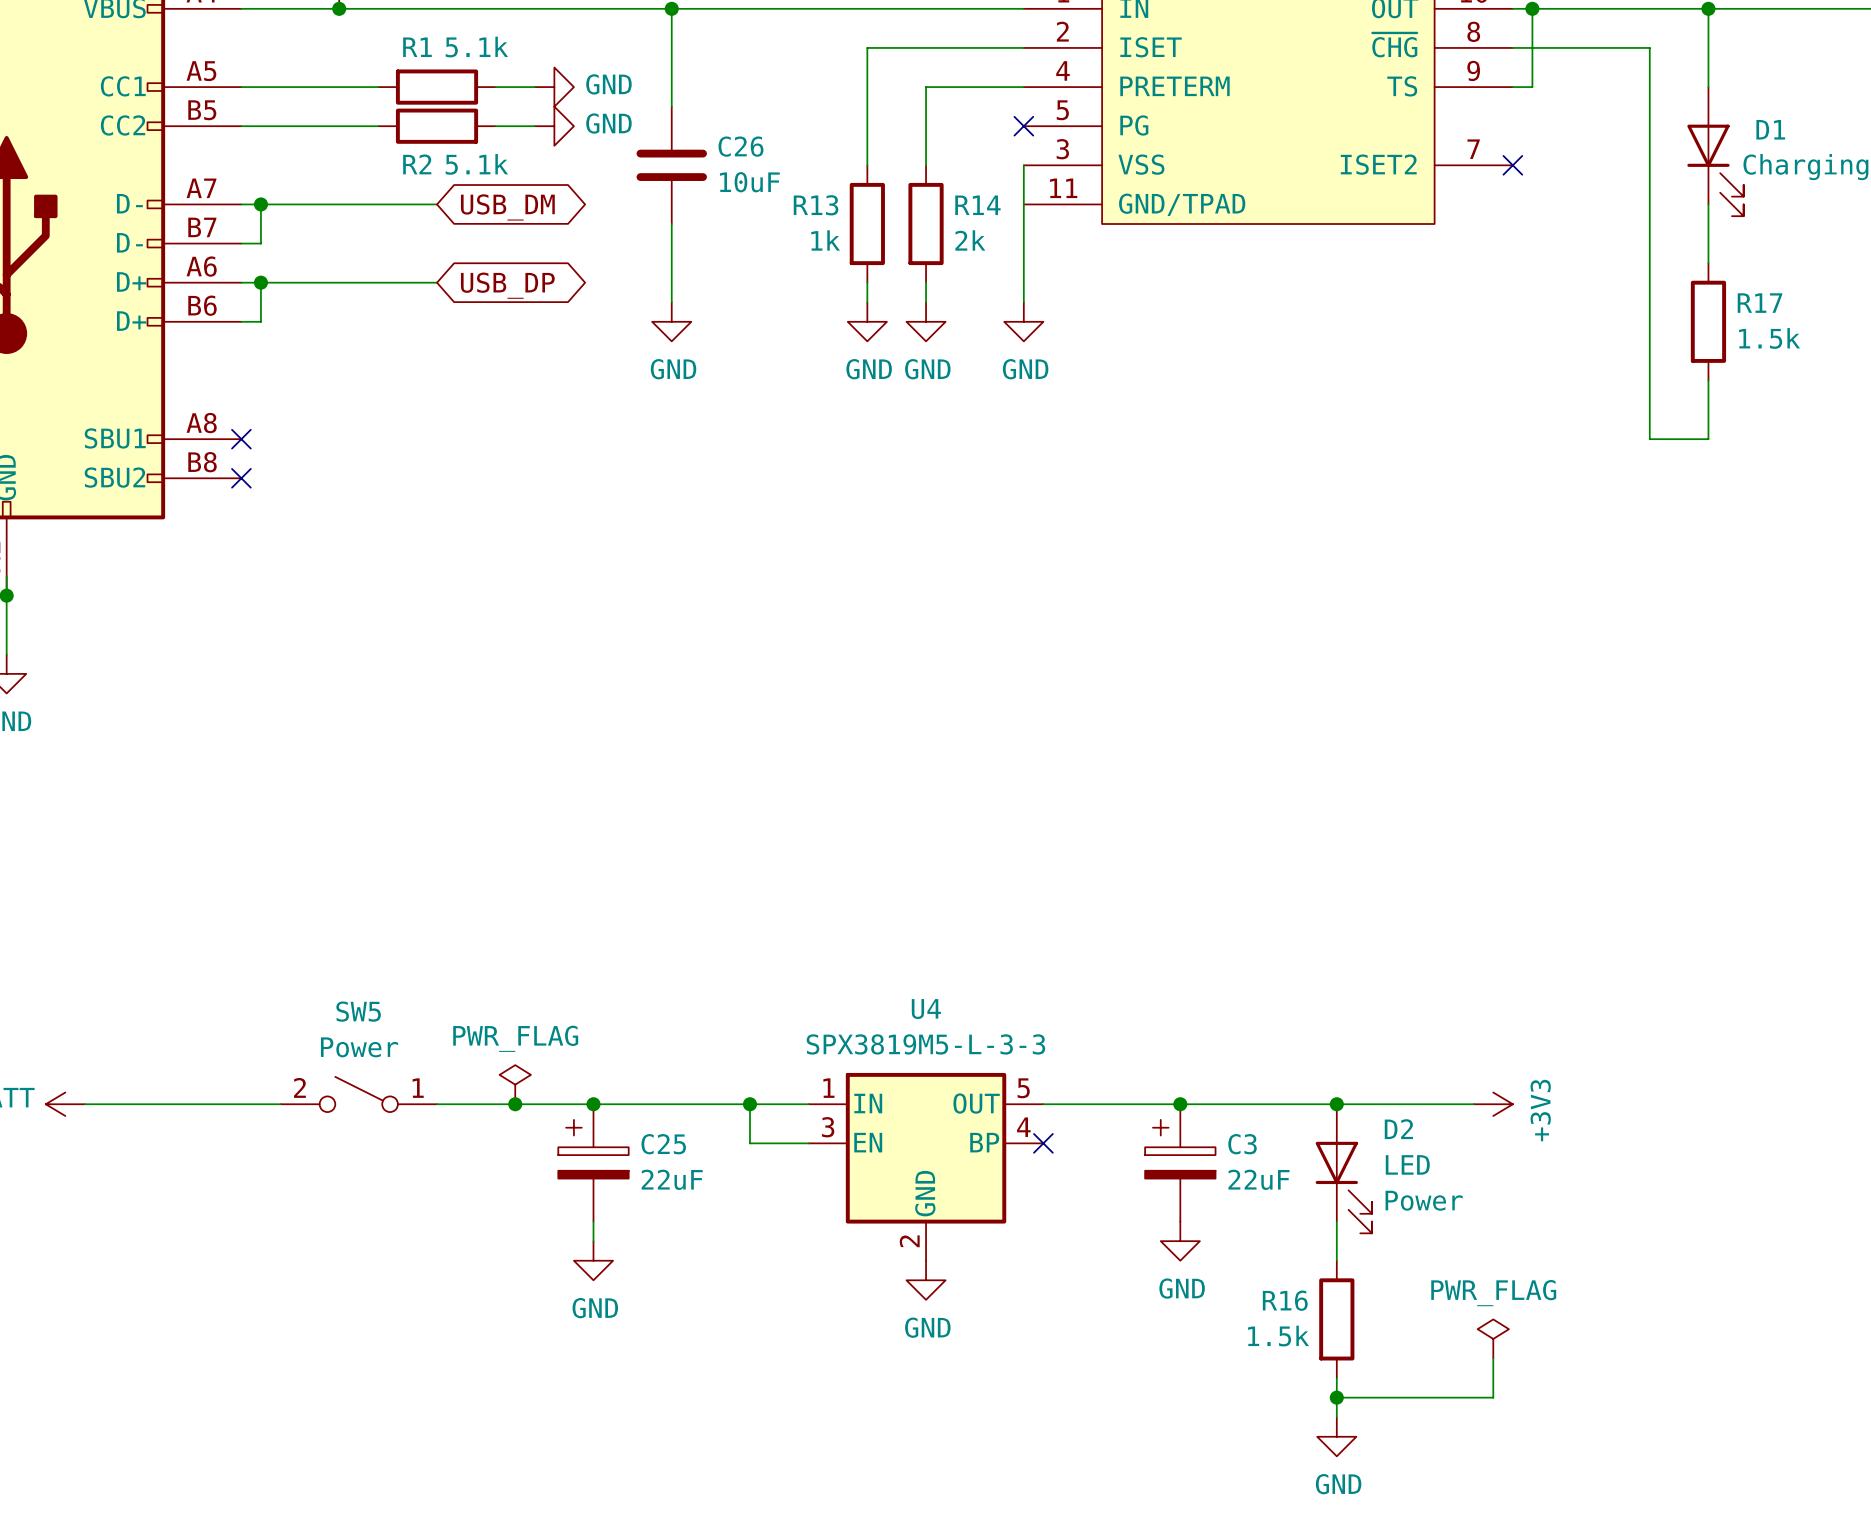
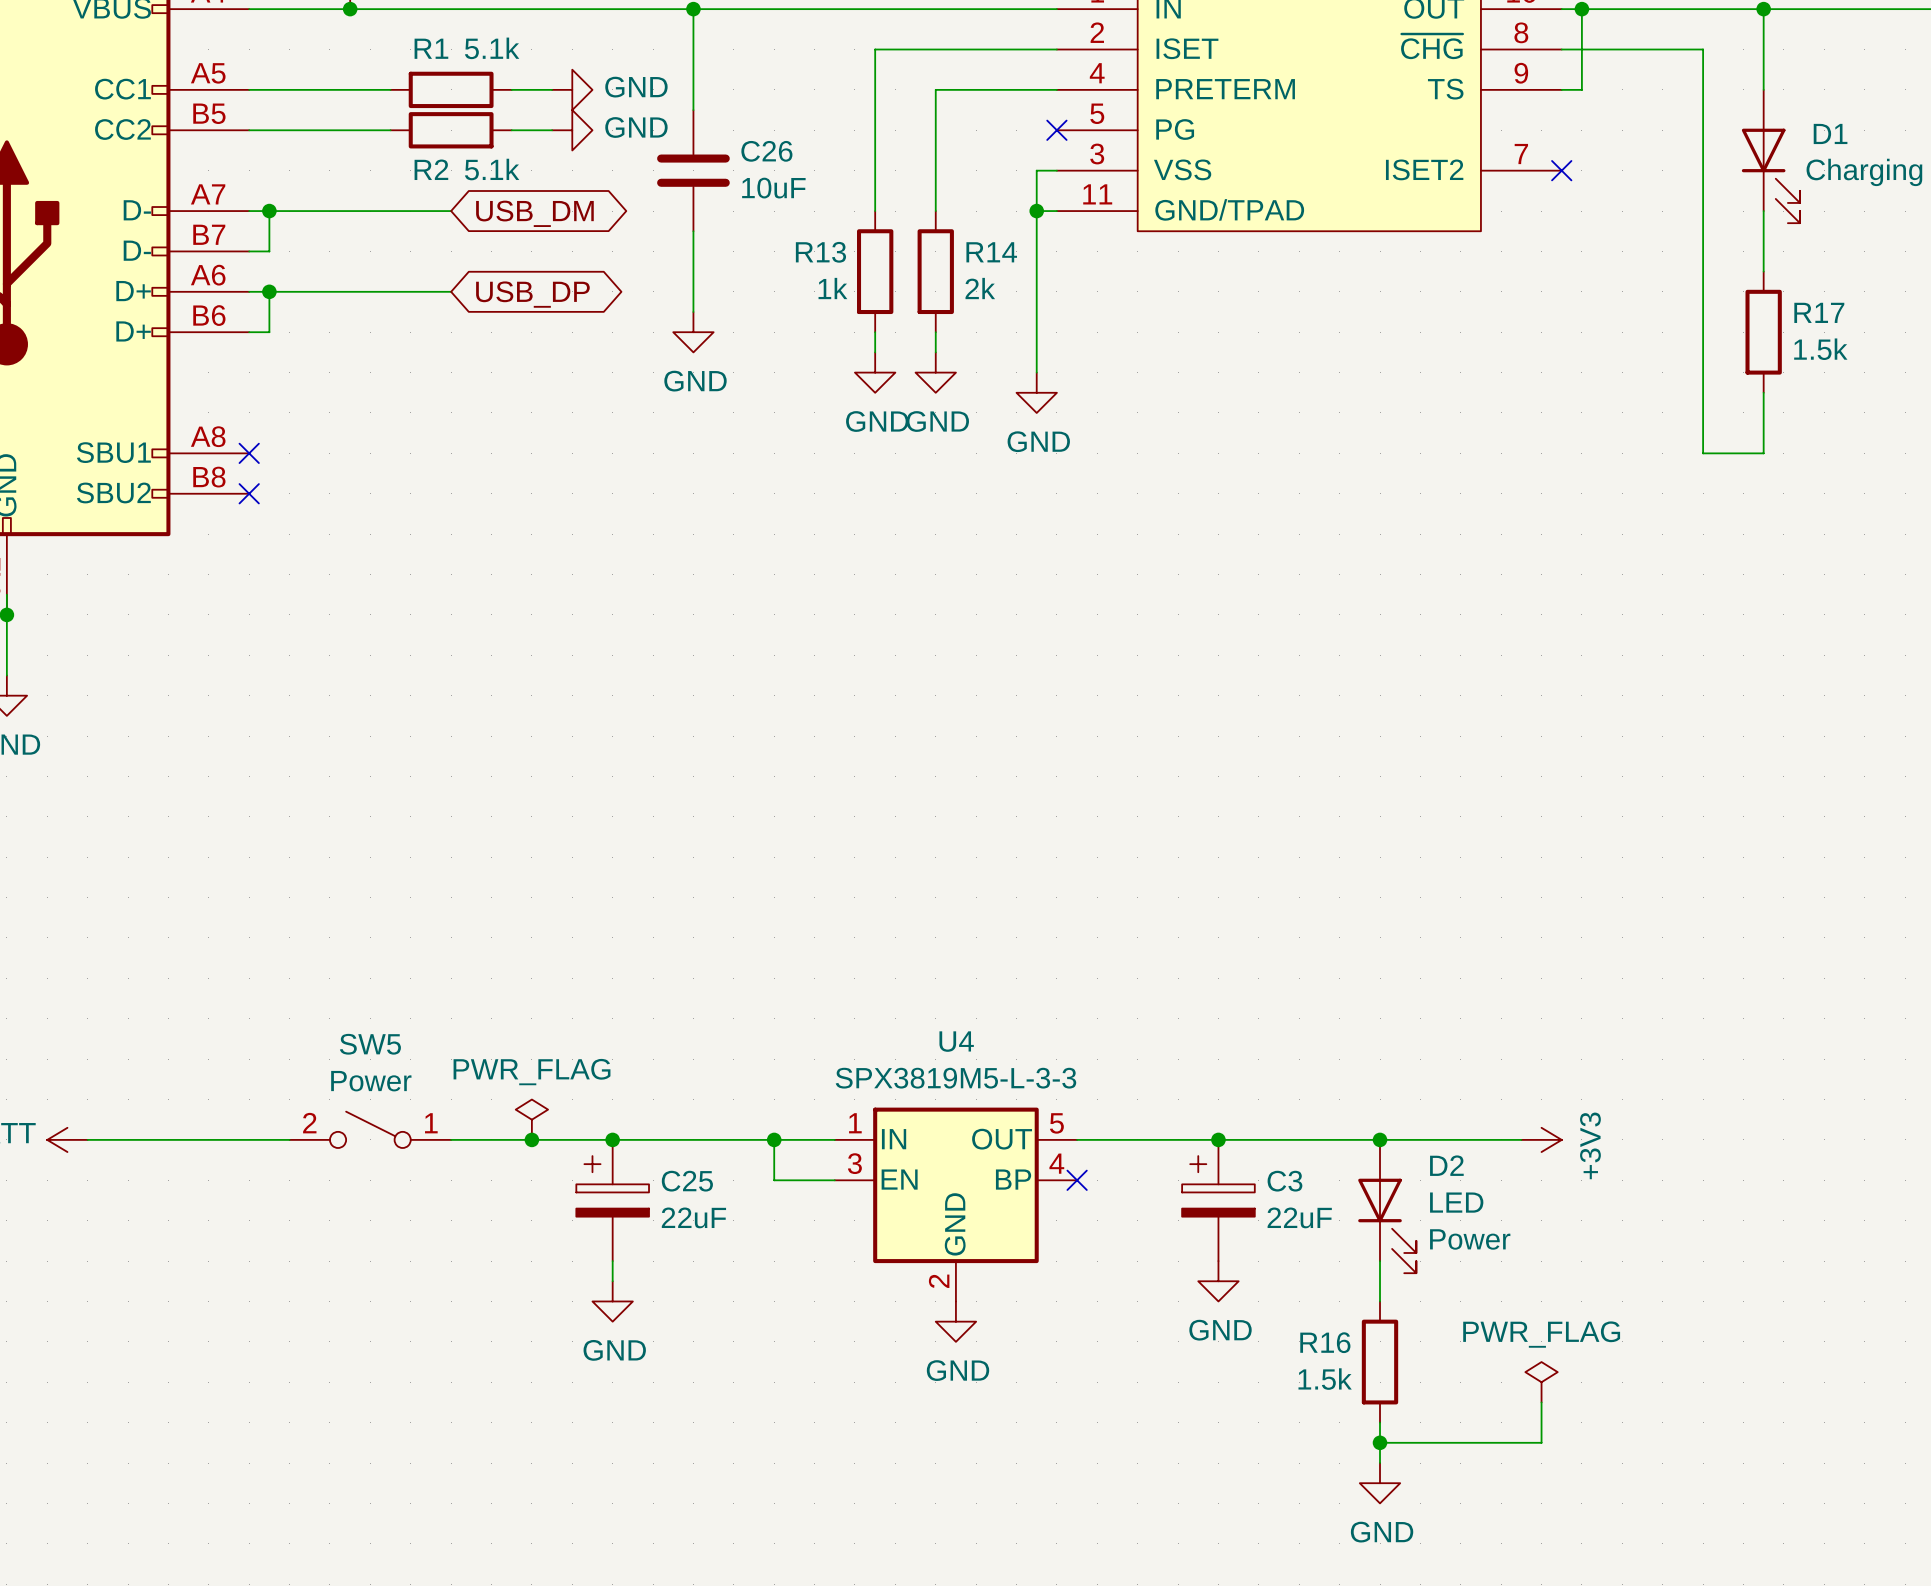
wire: (867, 47) (867, 165) -> (895, 49) (875, 49) (875, 211)
wire: (926, 87) (926, 165) -> (955, 89) (935, 89) (935, 211)
wire: (1023, 165) (1023, 302) -> (1056, 170) (1036, 170) (1036, 372)
wire: none -> (1036, 211) (1056, 211)
junction: none -> (1036, 211)
R13 position: (867, 224) -> (875, 271)
R14 position: (926, 224) -> (935, 271)
wire: (867, 282) (867, 302) -> (875, 332) (875, 352)
wire: (926, 282) (926, 302) -> (935, 332) (935, 352)
power symbol: GND (867, 321) -> none
power symbol: GND (926, 321) -> none
power symbol: GND (1023, 321) -> none
power symbol: none -> GND (875, 372)
power symbol: none -> GND (935, 372)
power symbol: none -> GND (1036, 392)

